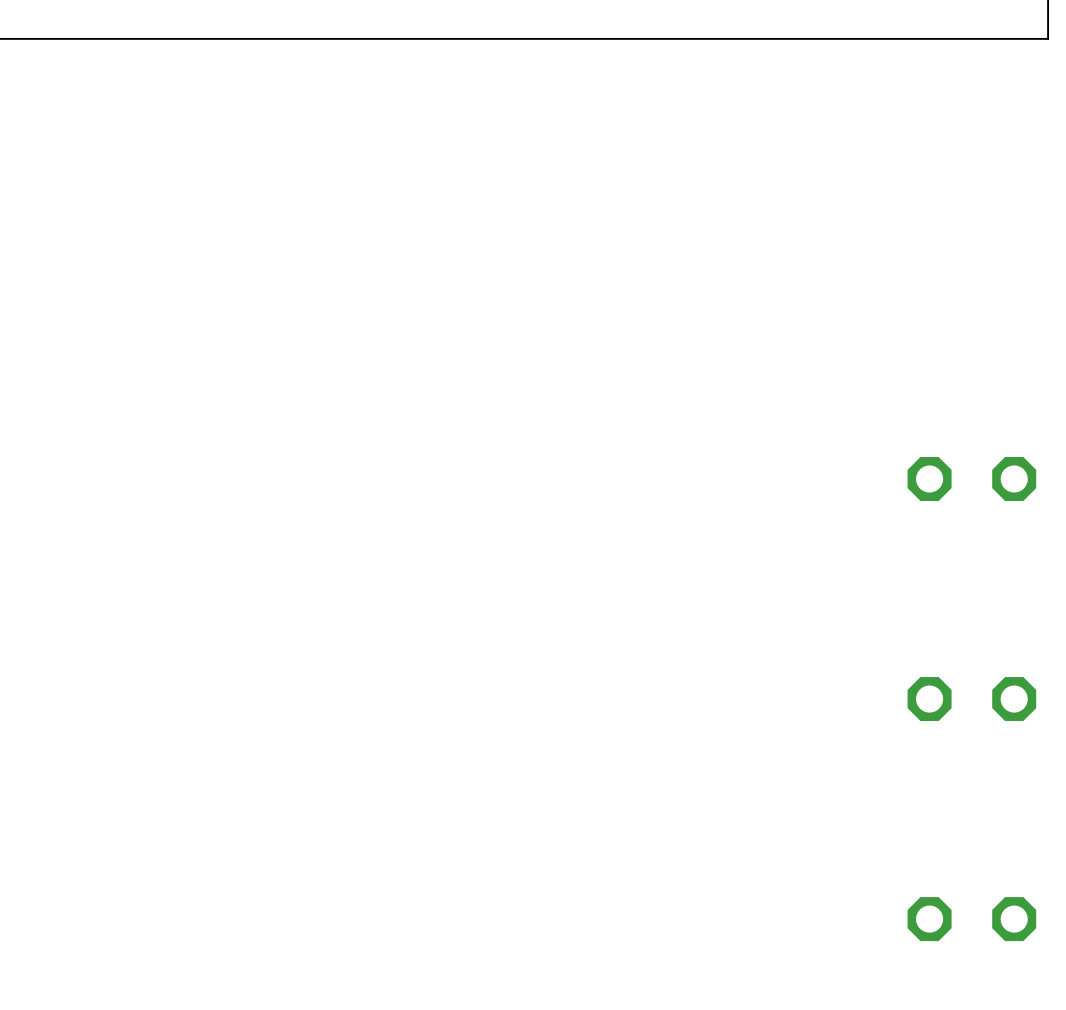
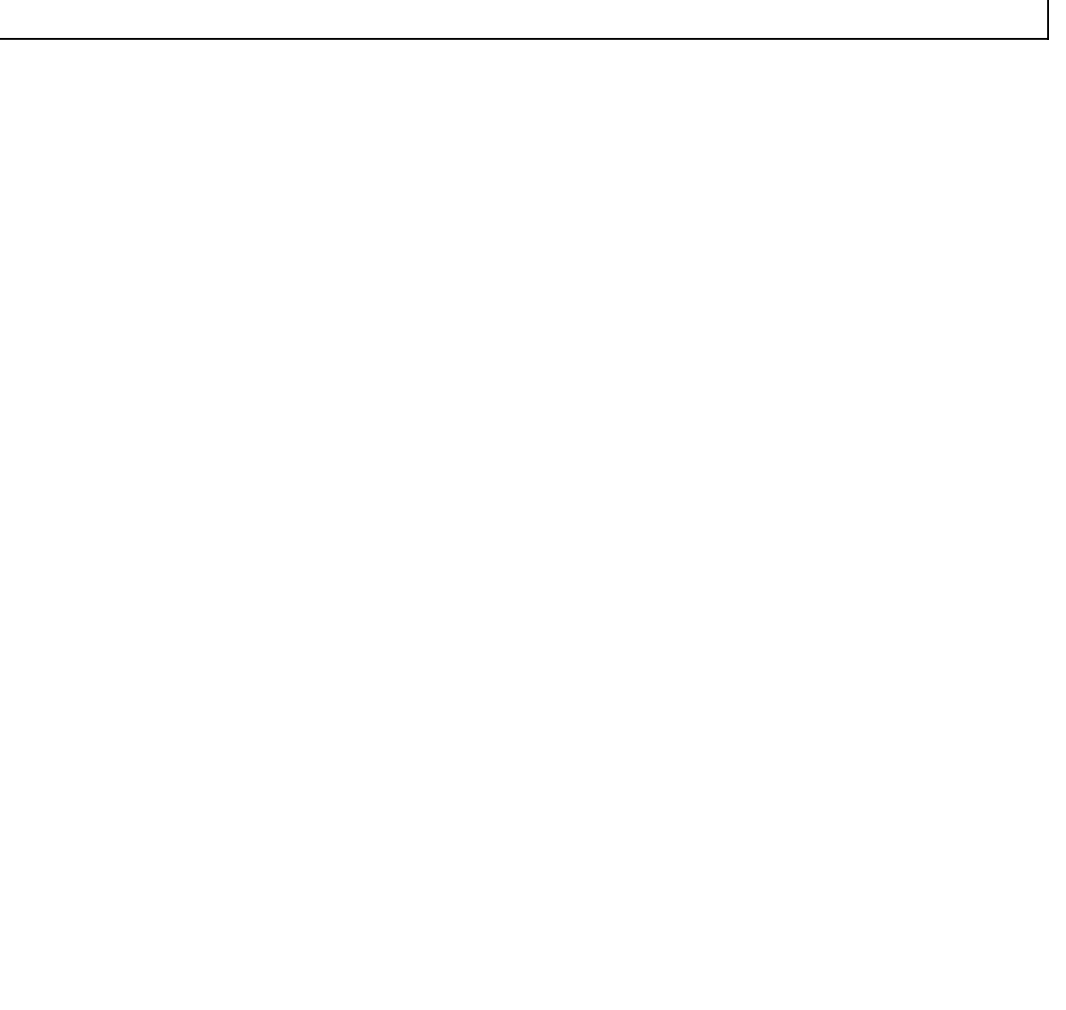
part: (971, 478) -> none
part: (971, 699) -> none
part: (971, 919) -> none

